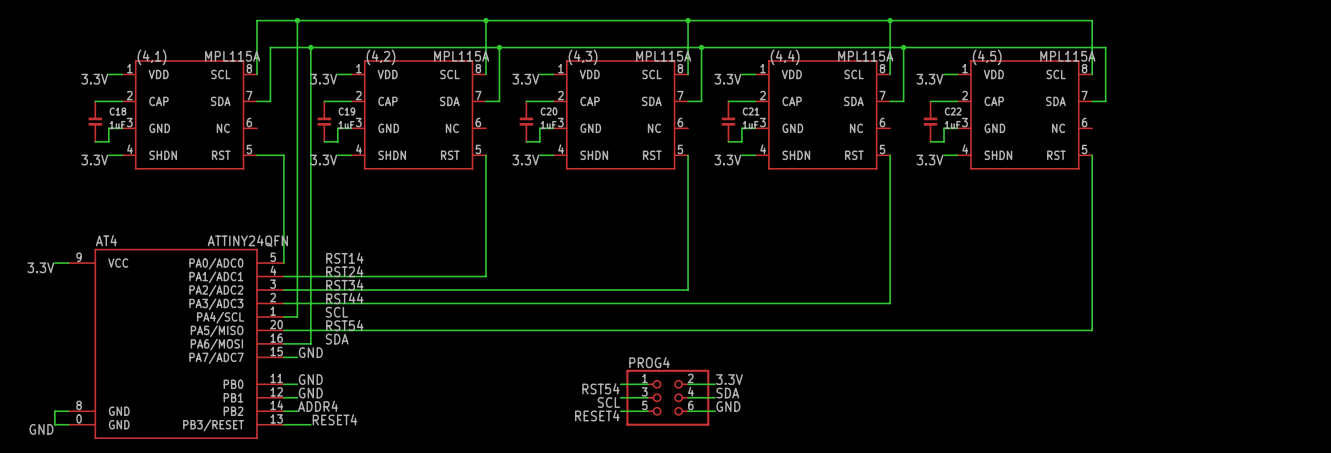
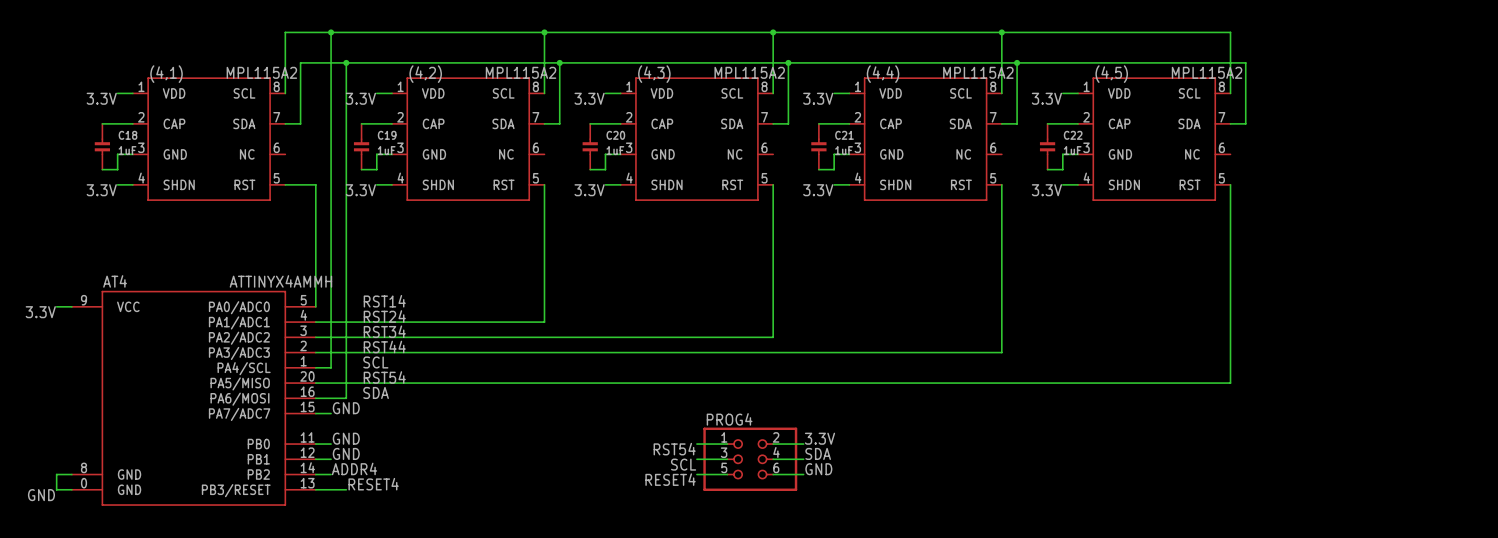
(4,1) value: MPL115A (232, 56) -> MPL115A2 (261, 72)
(4,2) value: MPL115A (461, 56) -> MPL115A2 (521, 72)
(4,3) value: MPL115A (663, 56) -> MPL115A2 (749, 72)
(4,4) value: MPL115A (865, 56) -> MPL115A2 (978, 72)
(4,5) value: MPL115A (1067, 56) -> MPL115A2 (1207, 72)
AT4 value: ATTINY24QFN (247, 241) -> ATTINYX4AMMH (280, 281)

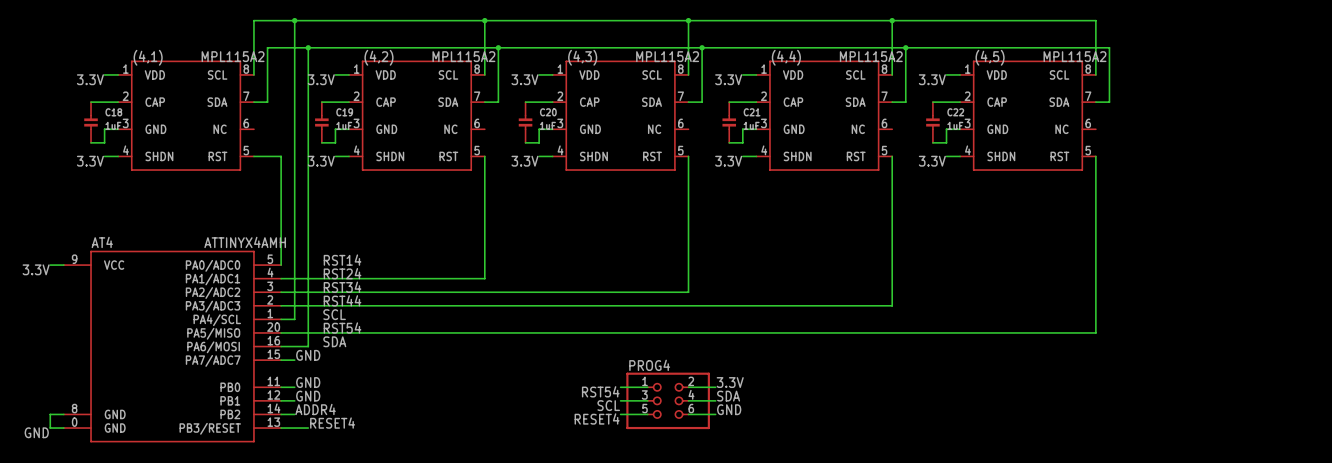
AT4 value: ATTINYX4AMMH (280, 281) -> ATTINYX4AMH (245, 242)

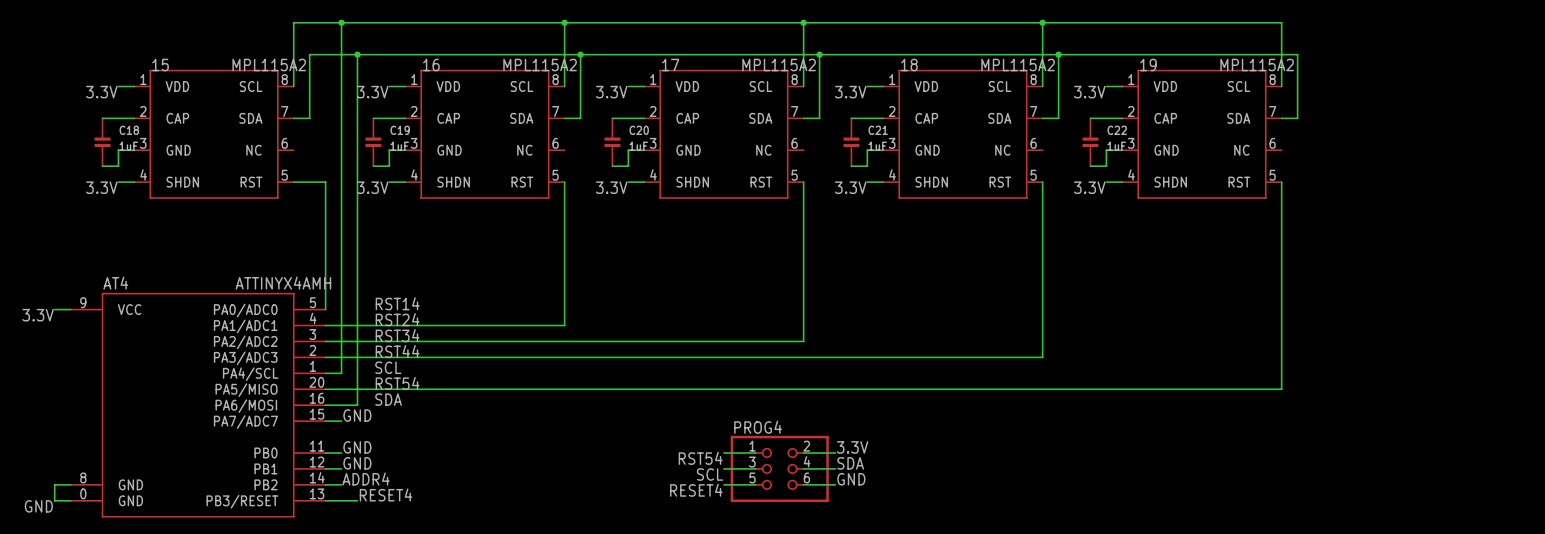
(4,1) name: (4,1) (148, 57) -> 15 (160, 65)
(4,2) name: (4,2) (378, 57) -> 16 (431, 65)
(4,3) name: (4,3) (582, 57) -> 17 (670, 65)
(4,4) name: (4,4) (786, 57) -> 18 (909, 65)
(4,5) name: (4,5) (990, 57) -> 19 (1148, 65)

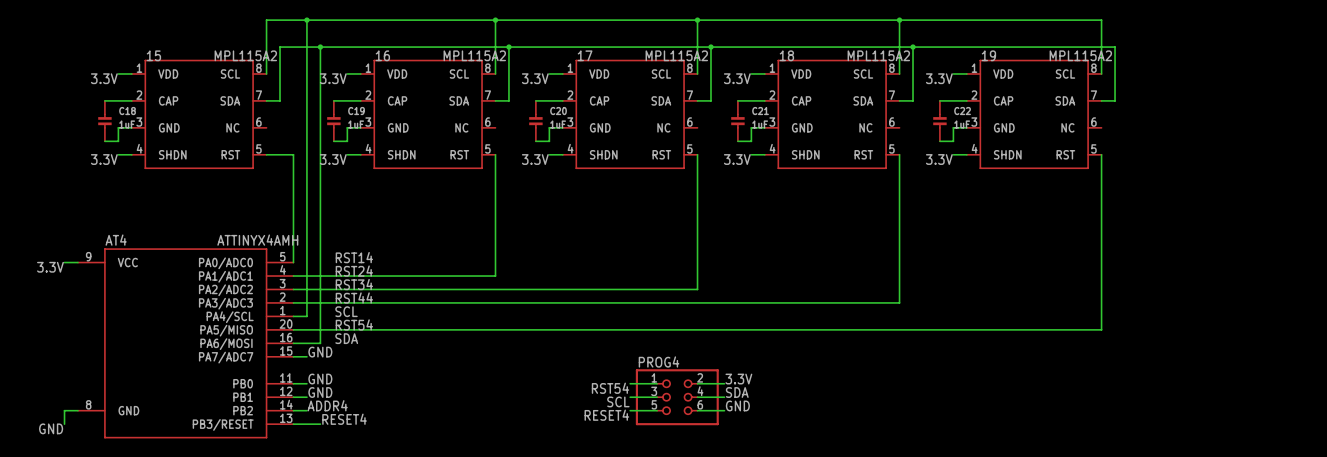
AT4 symbol: [70, 292, 326, 518] -> [77, 248, 294, 439]
wire: (54, 500) (70, 500) -> none

